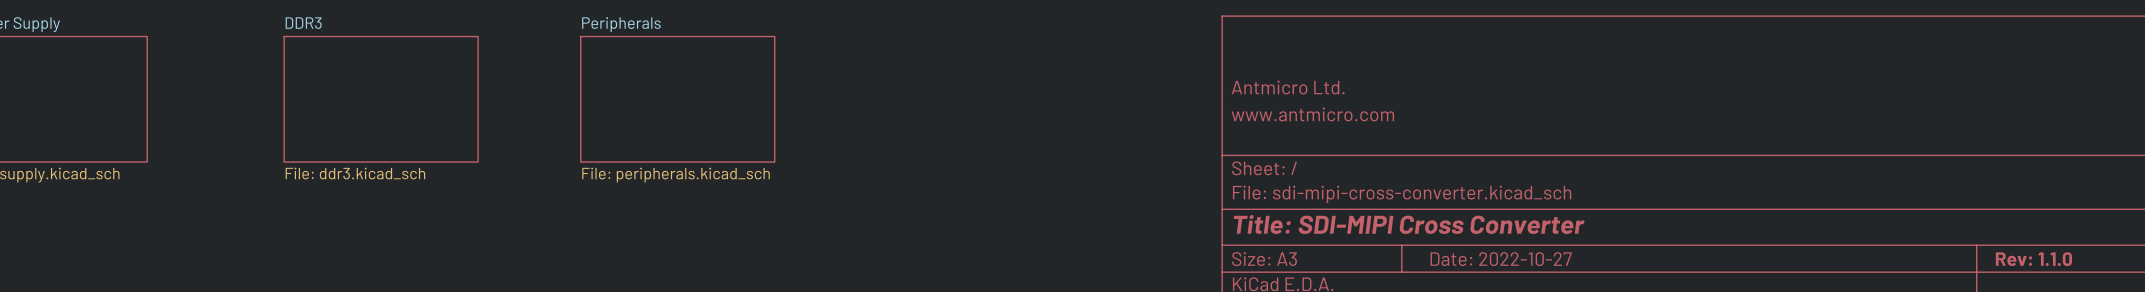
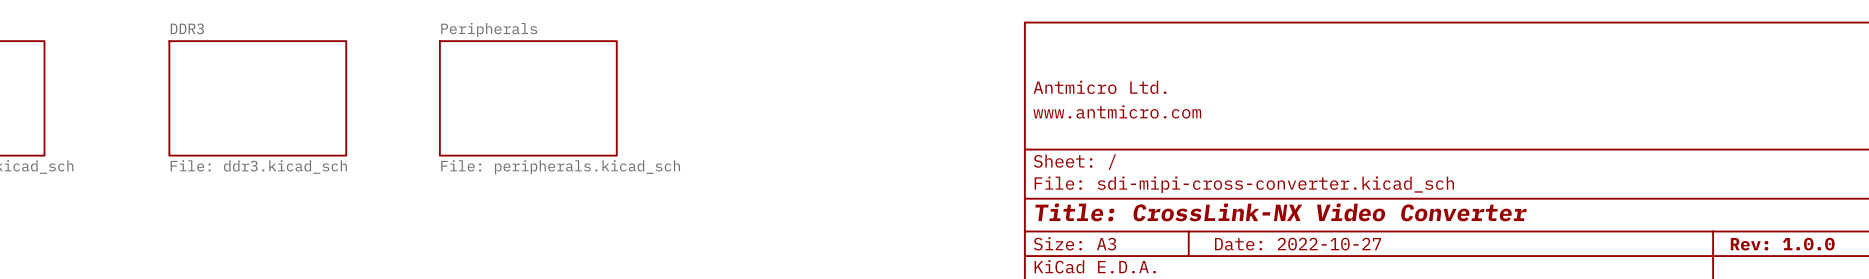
title block: Title: SDI-MIPI Cross Converter (1409, 224) -> Title: CrossLink-NX Video Converter (1281, 212)
title block: Rev: 1.1.0 (2033, 259) -> Rev: 1.0.0 (1782, 244)

